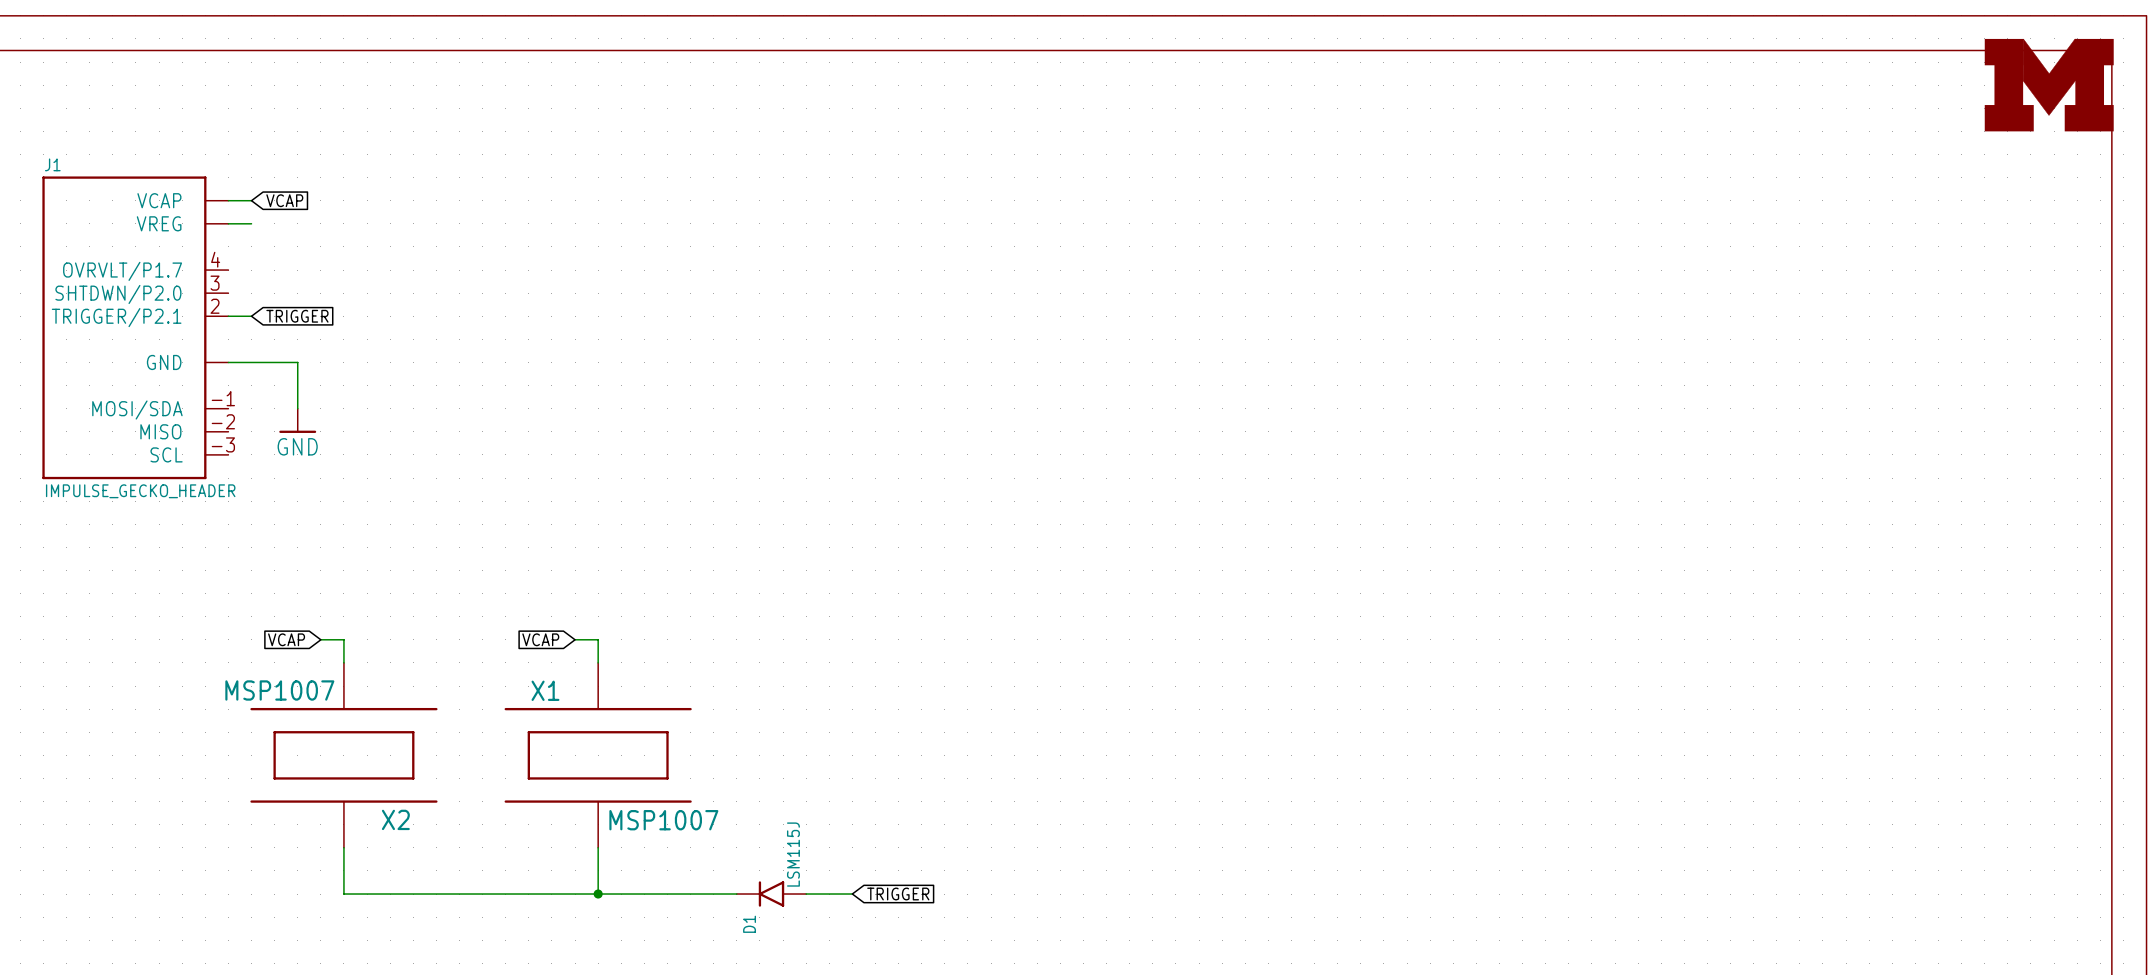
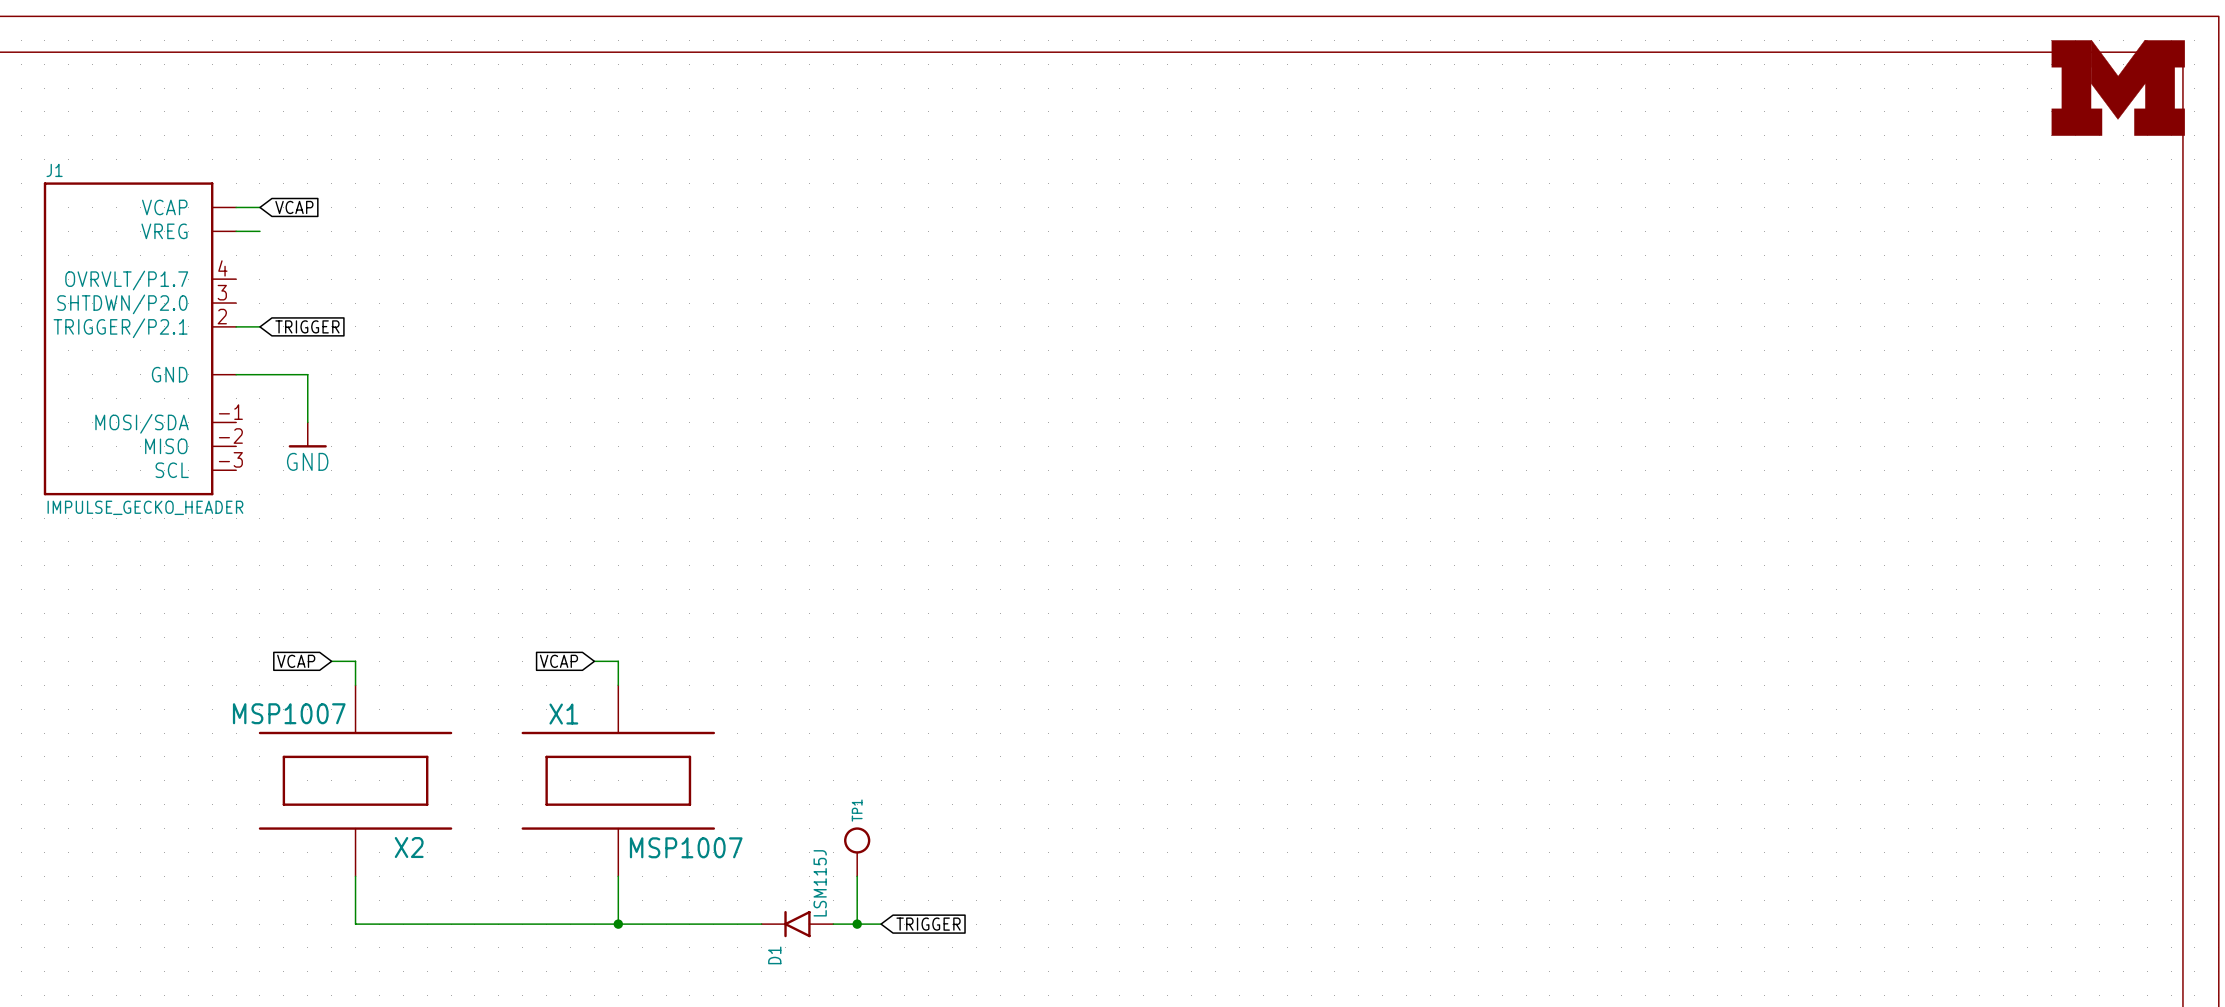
TP1: none -> (857, 851)
wire: none -> (857, 876) (857, 924)
junction: none -> (857, 924)

